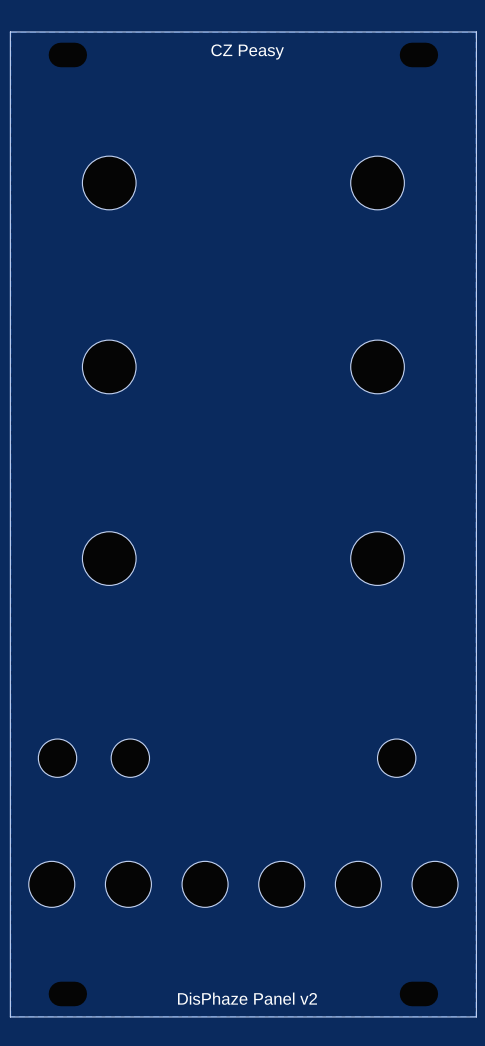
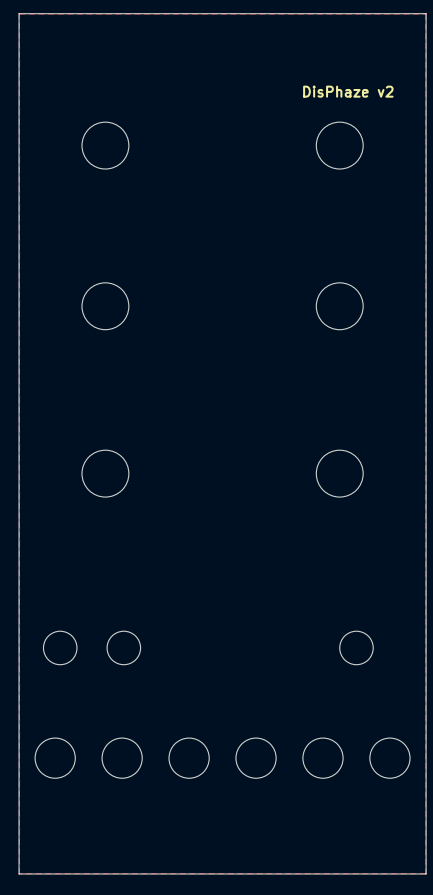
text: CZ Peasy (247, 51) -> none
text: none -> DisPhaze v2 (348, 91)
text: DisPhaze Panel v2 (247, 998) -> none

